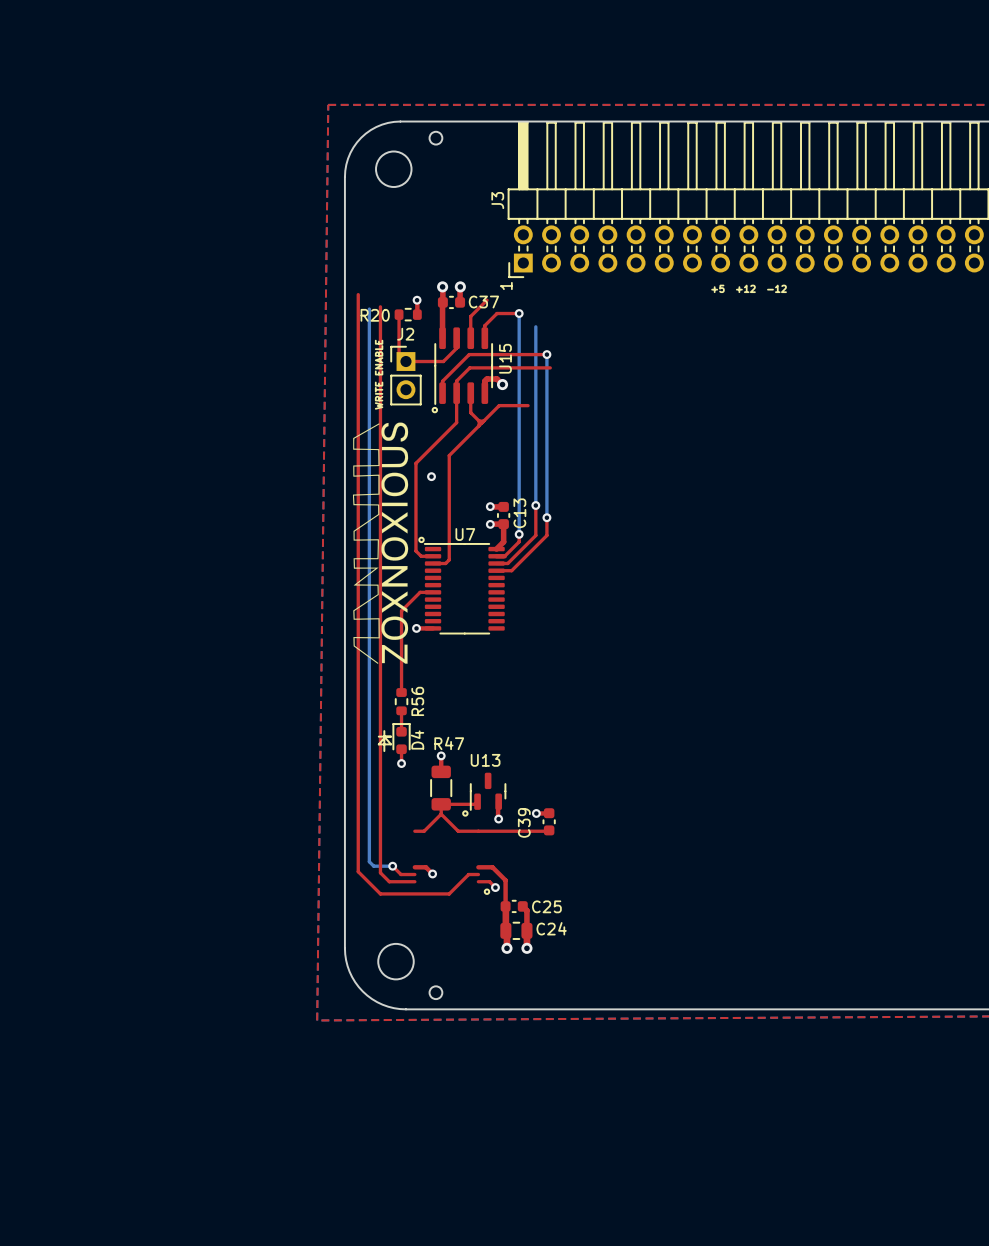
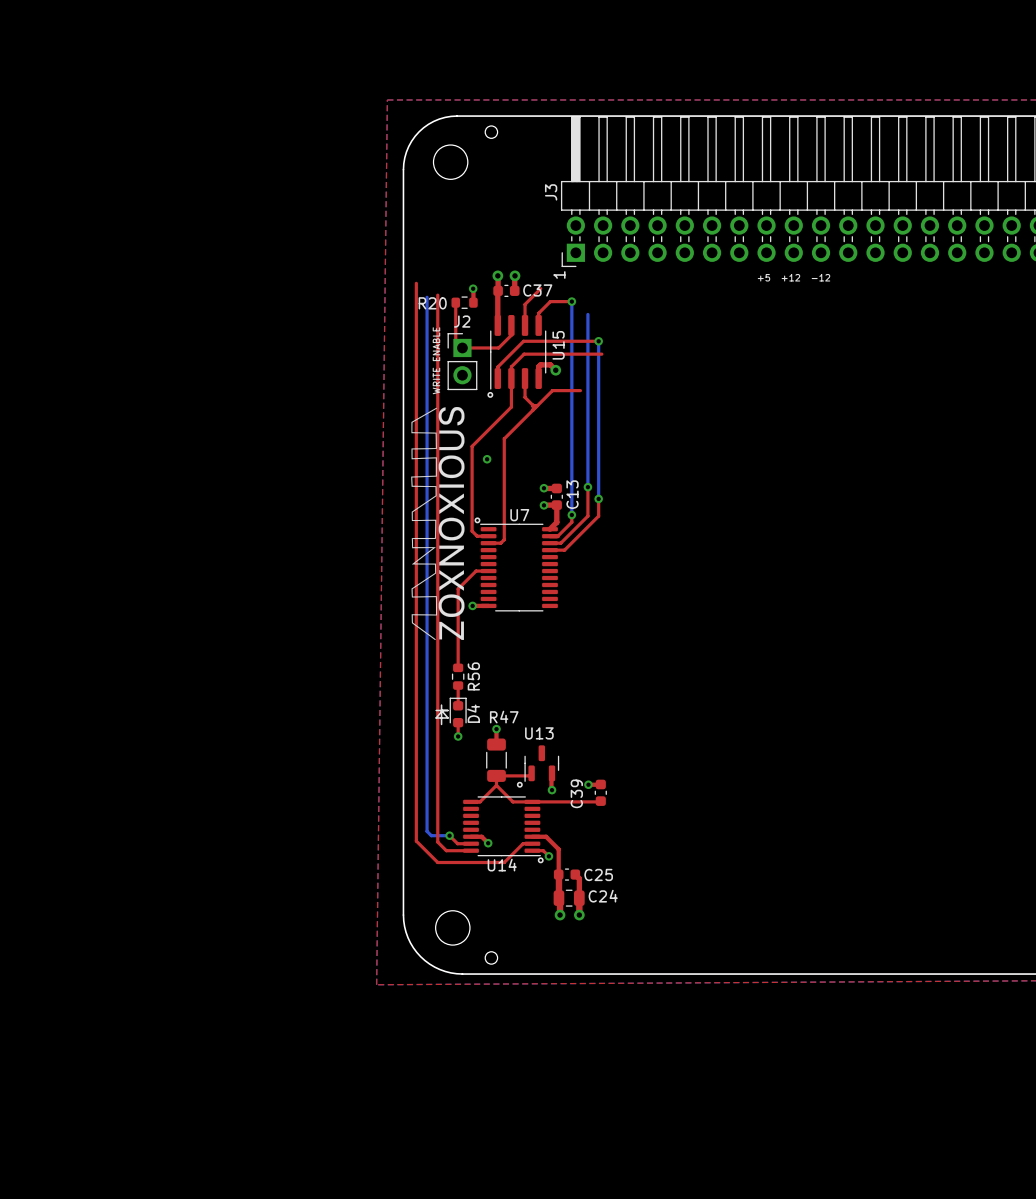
U14: none -> (502, 826)

